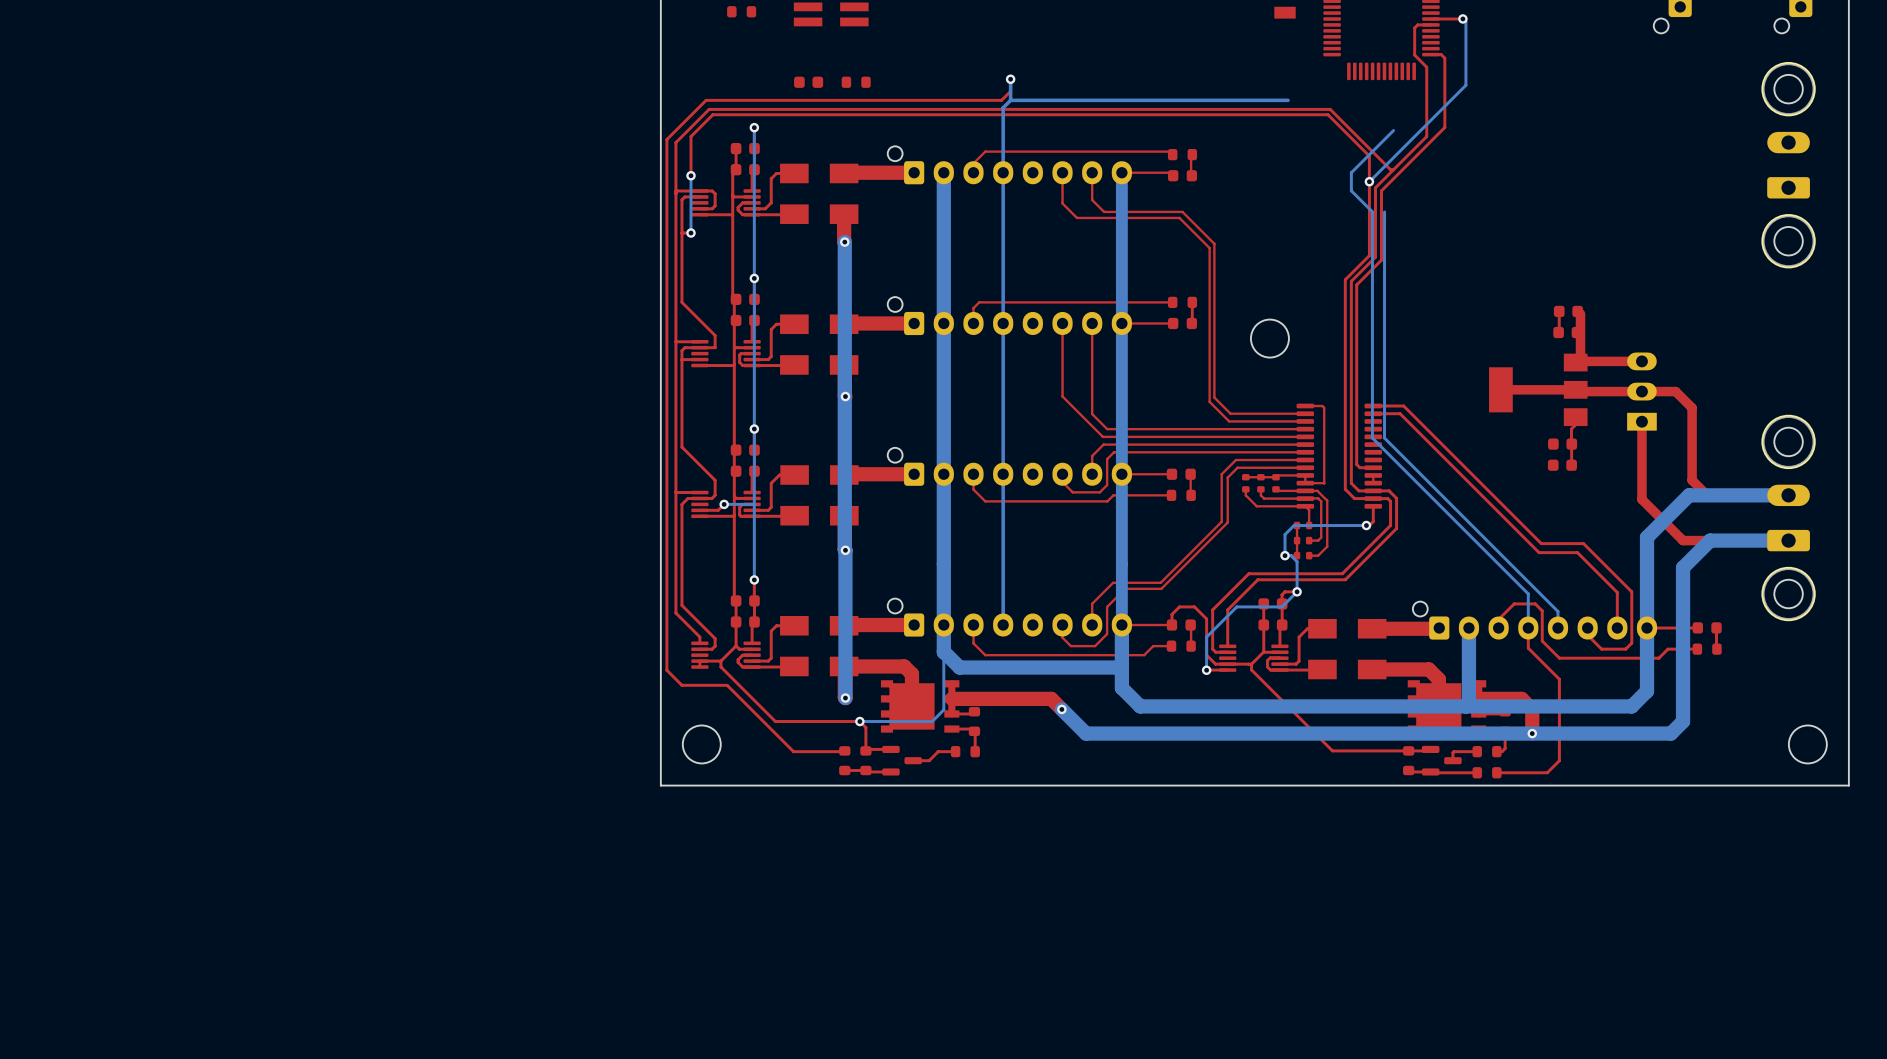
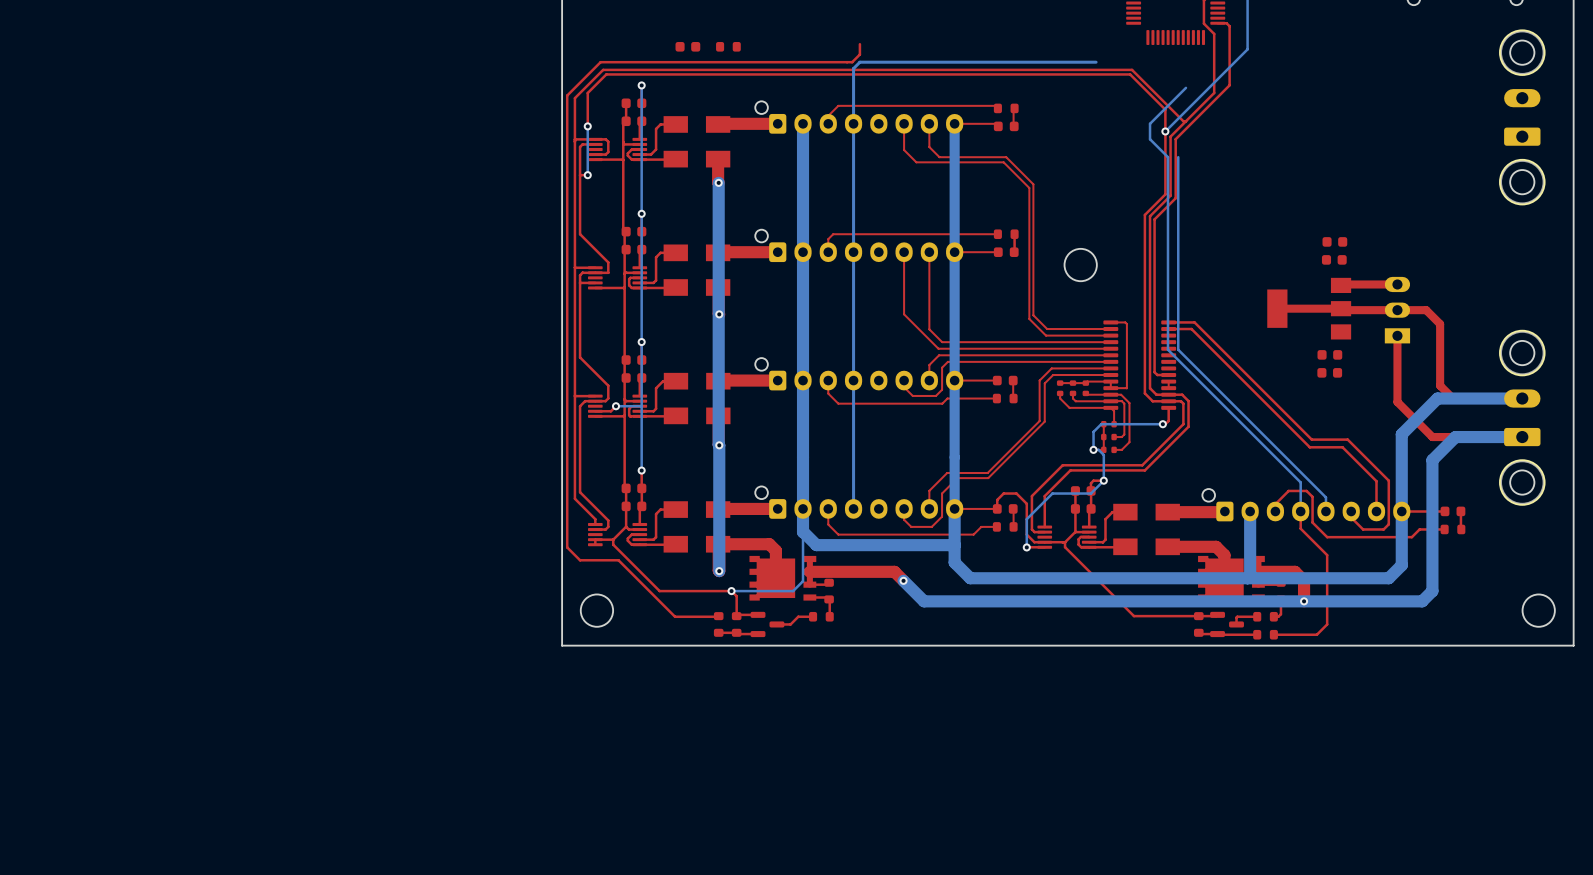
bottom track: (1010, 79) (1010, 100) -> none
via: (1010, 79) -> none
top track: (1559, 311) (1558, 332) -> none
top track: (1577, 311) (1580, 314) (1580, 357) (1576, 361) -> none
top track: (1575, 417) (1575, 424) (1571, 429) (1571, 444) -> none
top track: (1571, 444) (1571, 465) -> none

